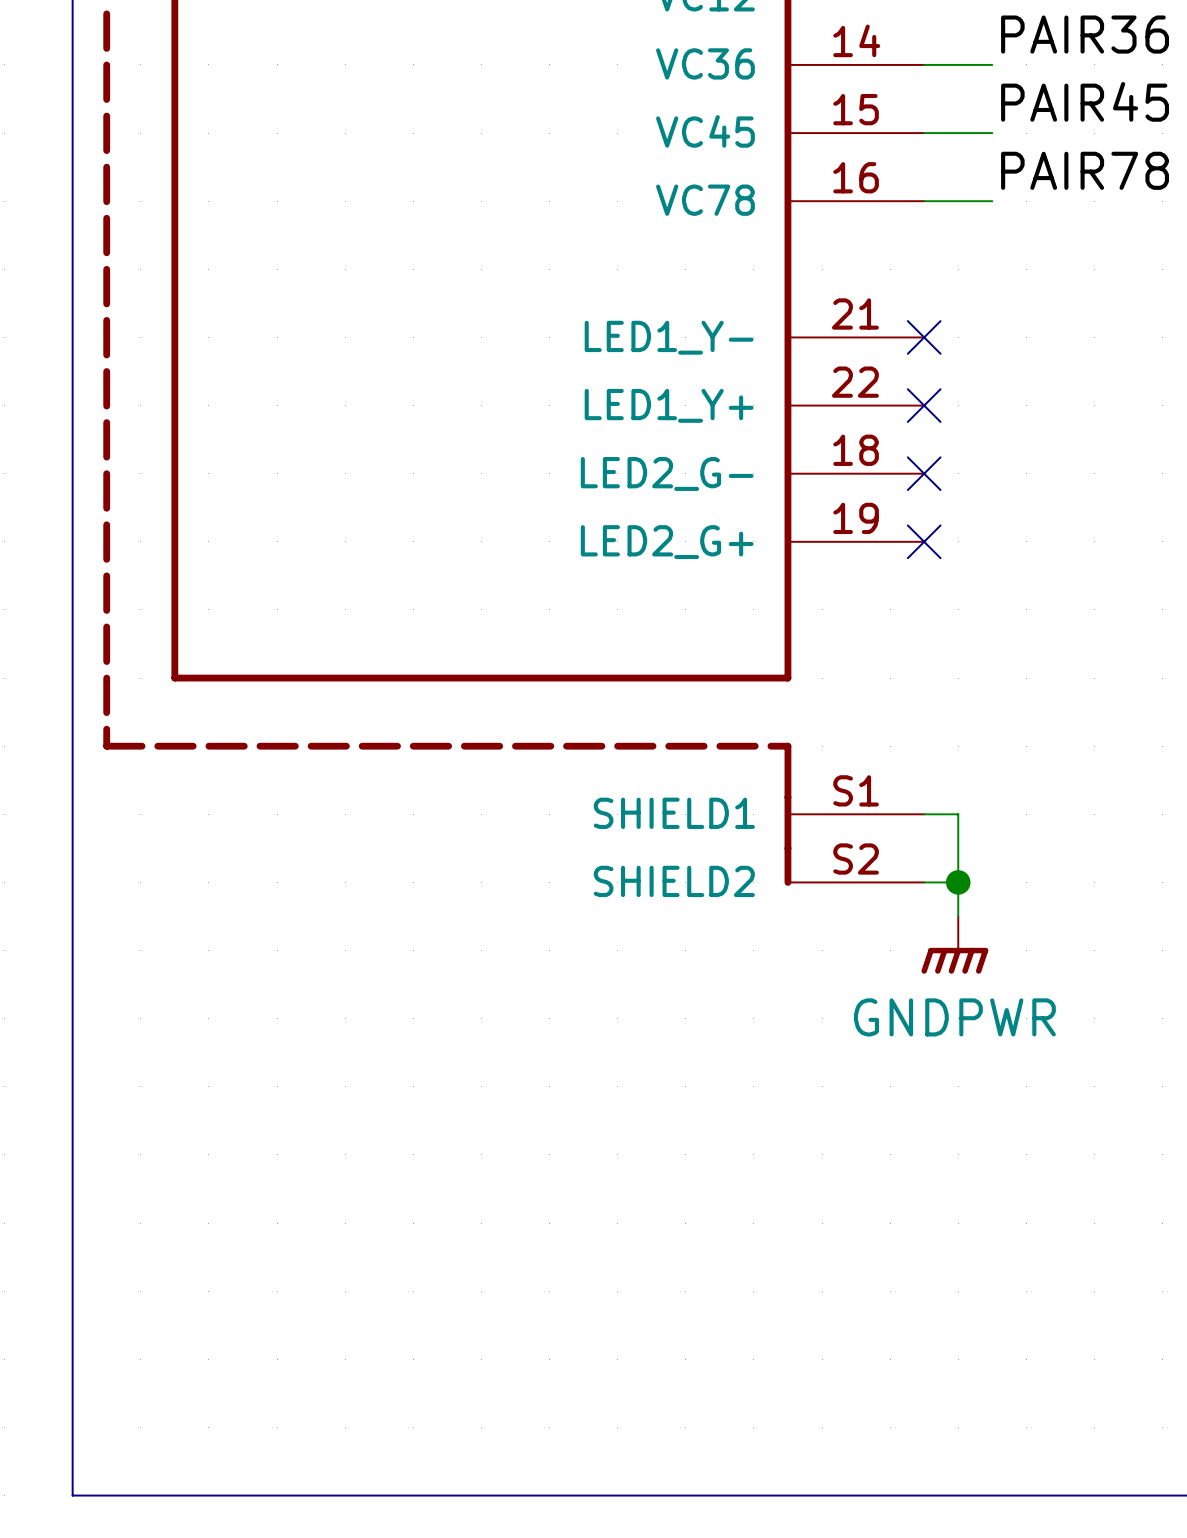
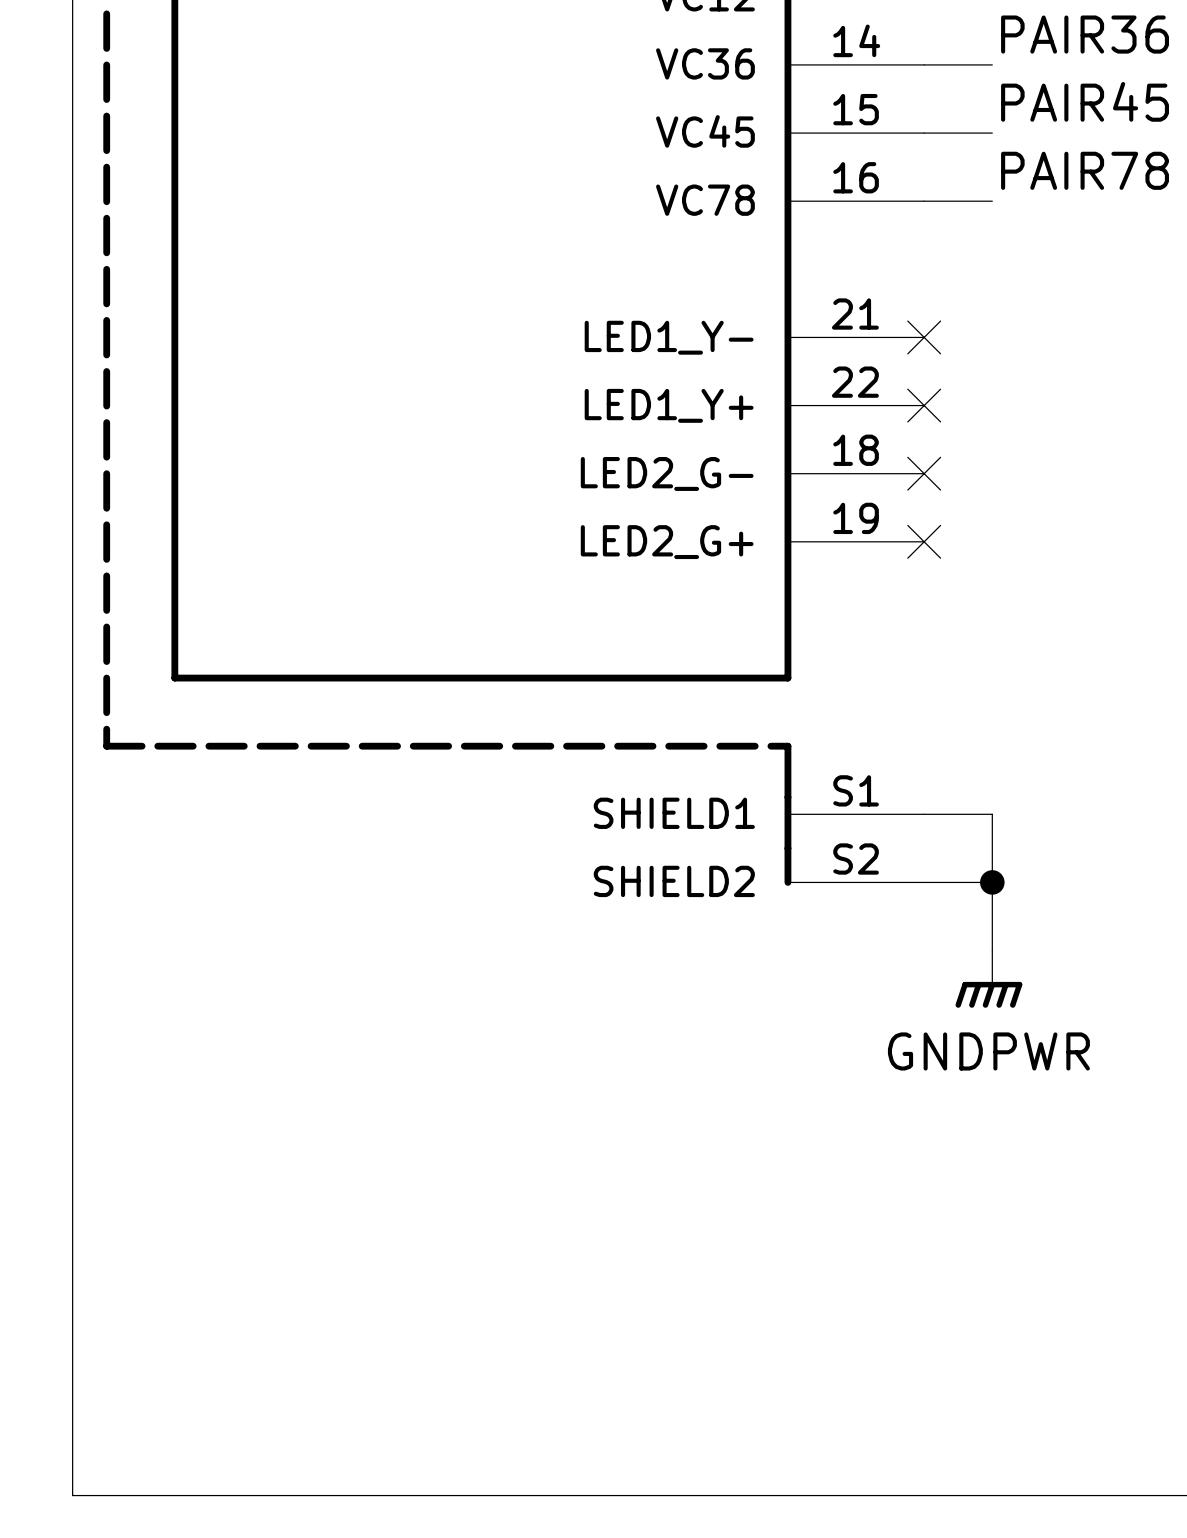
wire: (958, 814) (958, 916) -> (958, 814) (992, 814) (992, 950)
wire: none -> (958, 882) (992, 882)
junction position: (958, 882) -> (992, 882)
power symbol position: GNDPWR (954, 945) -> GNDPWR (988, 979)

